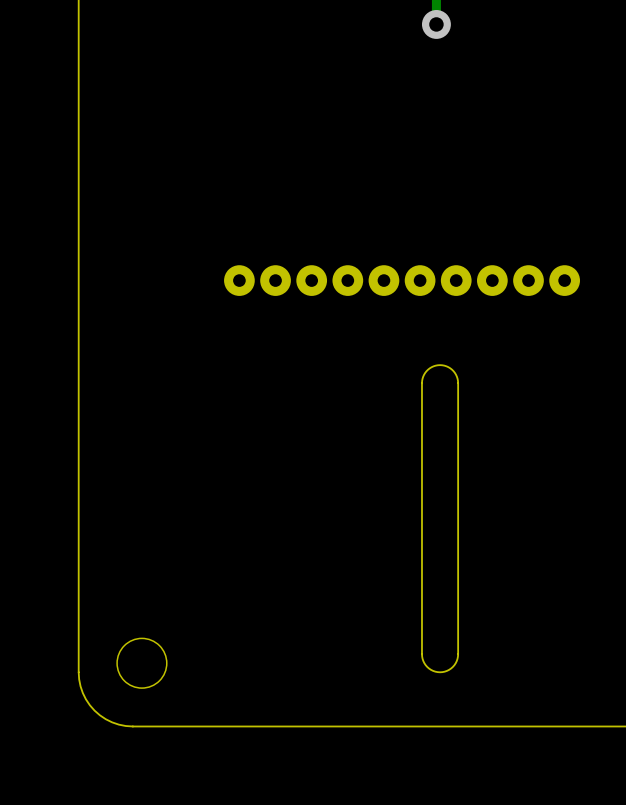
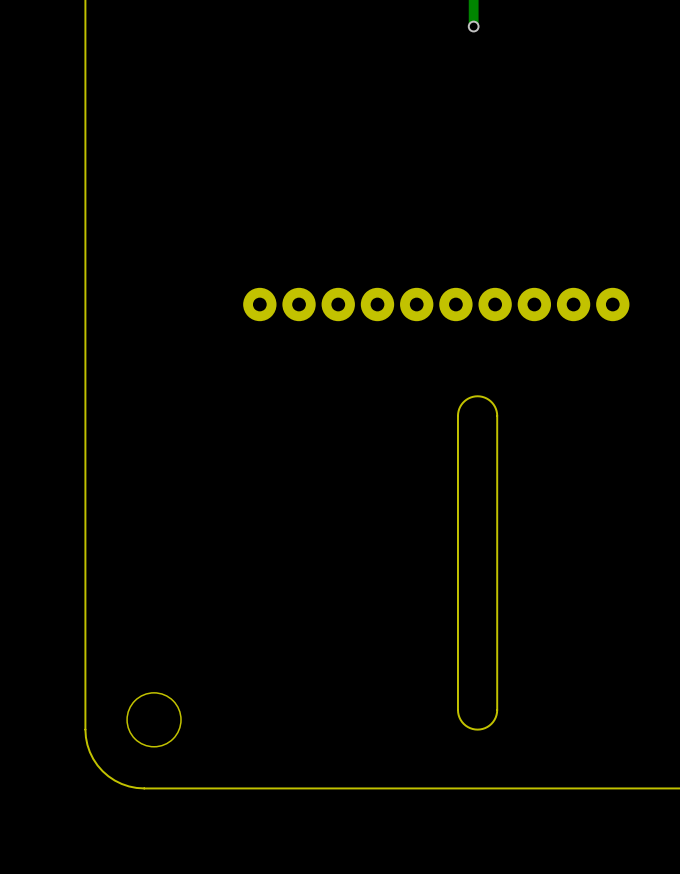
via size: [421, 10, 451, 39] -> [467, 20, 480, 33]

